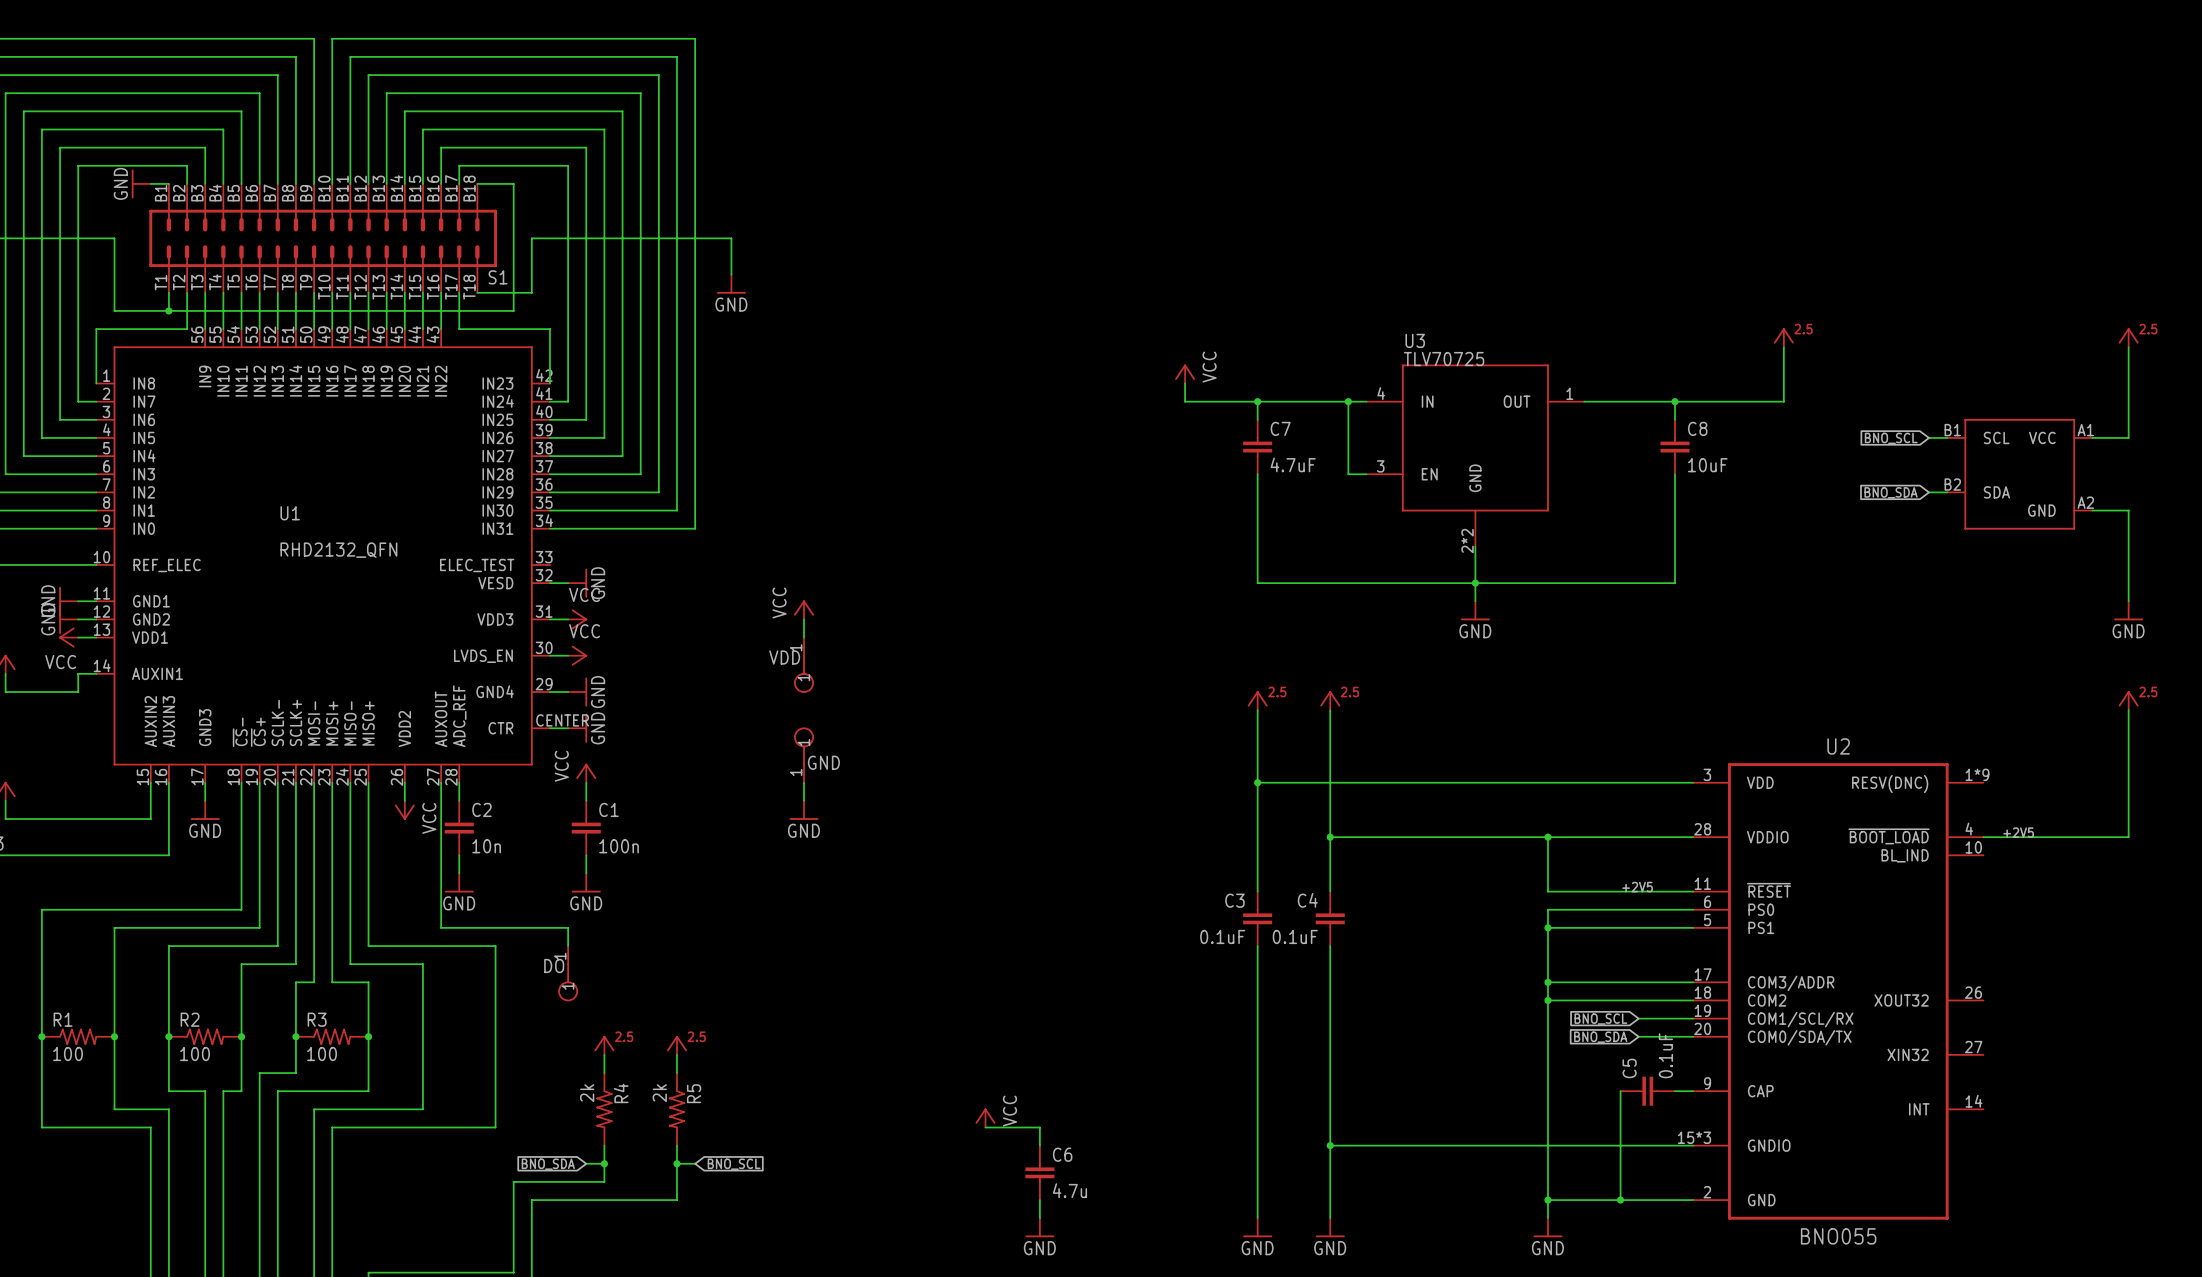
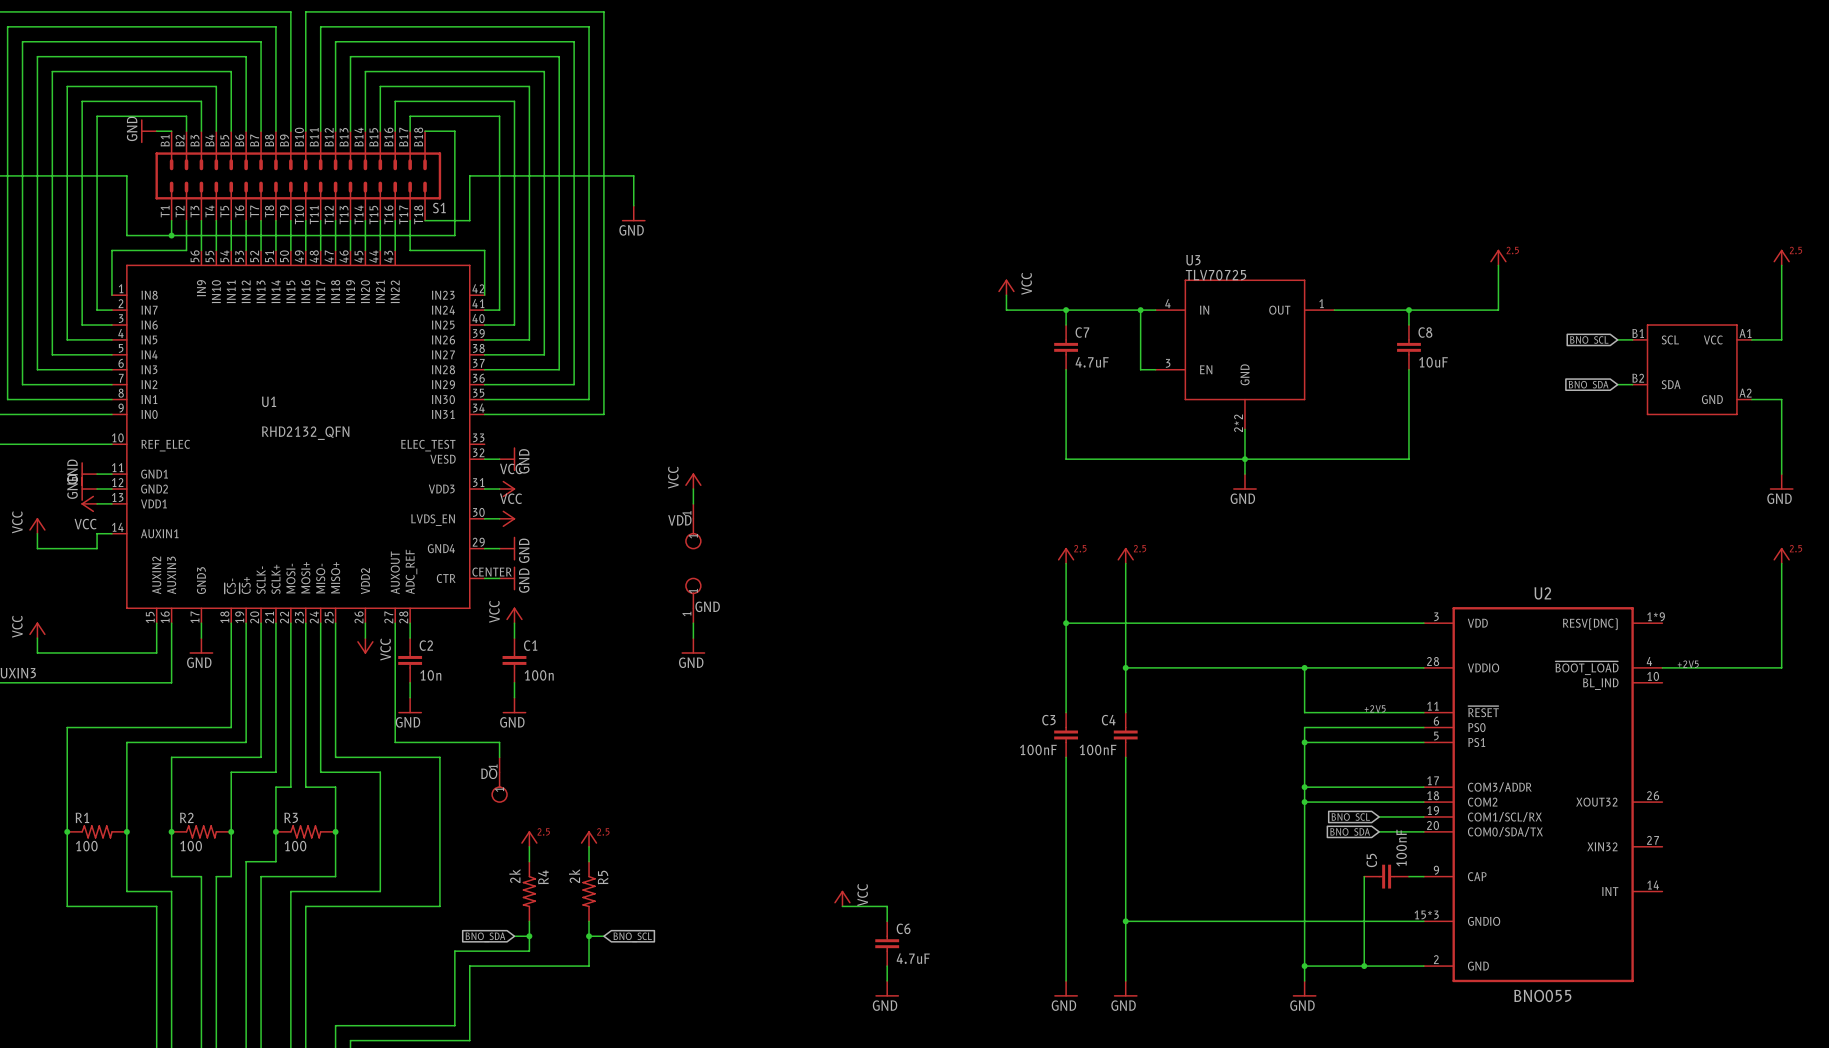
C3 value: 0.1uF (1222, 936) -> 100nF (1038, 749)
C4 value: 0.1uF (1295, 936) -> 100nF (1098, 749)
C5 value: 0.1uF (1665, 1055) -> 100nF (1401, 848)
C6 value: 4.7u (1069, 1190) -> 4.7uF (913, 958)

